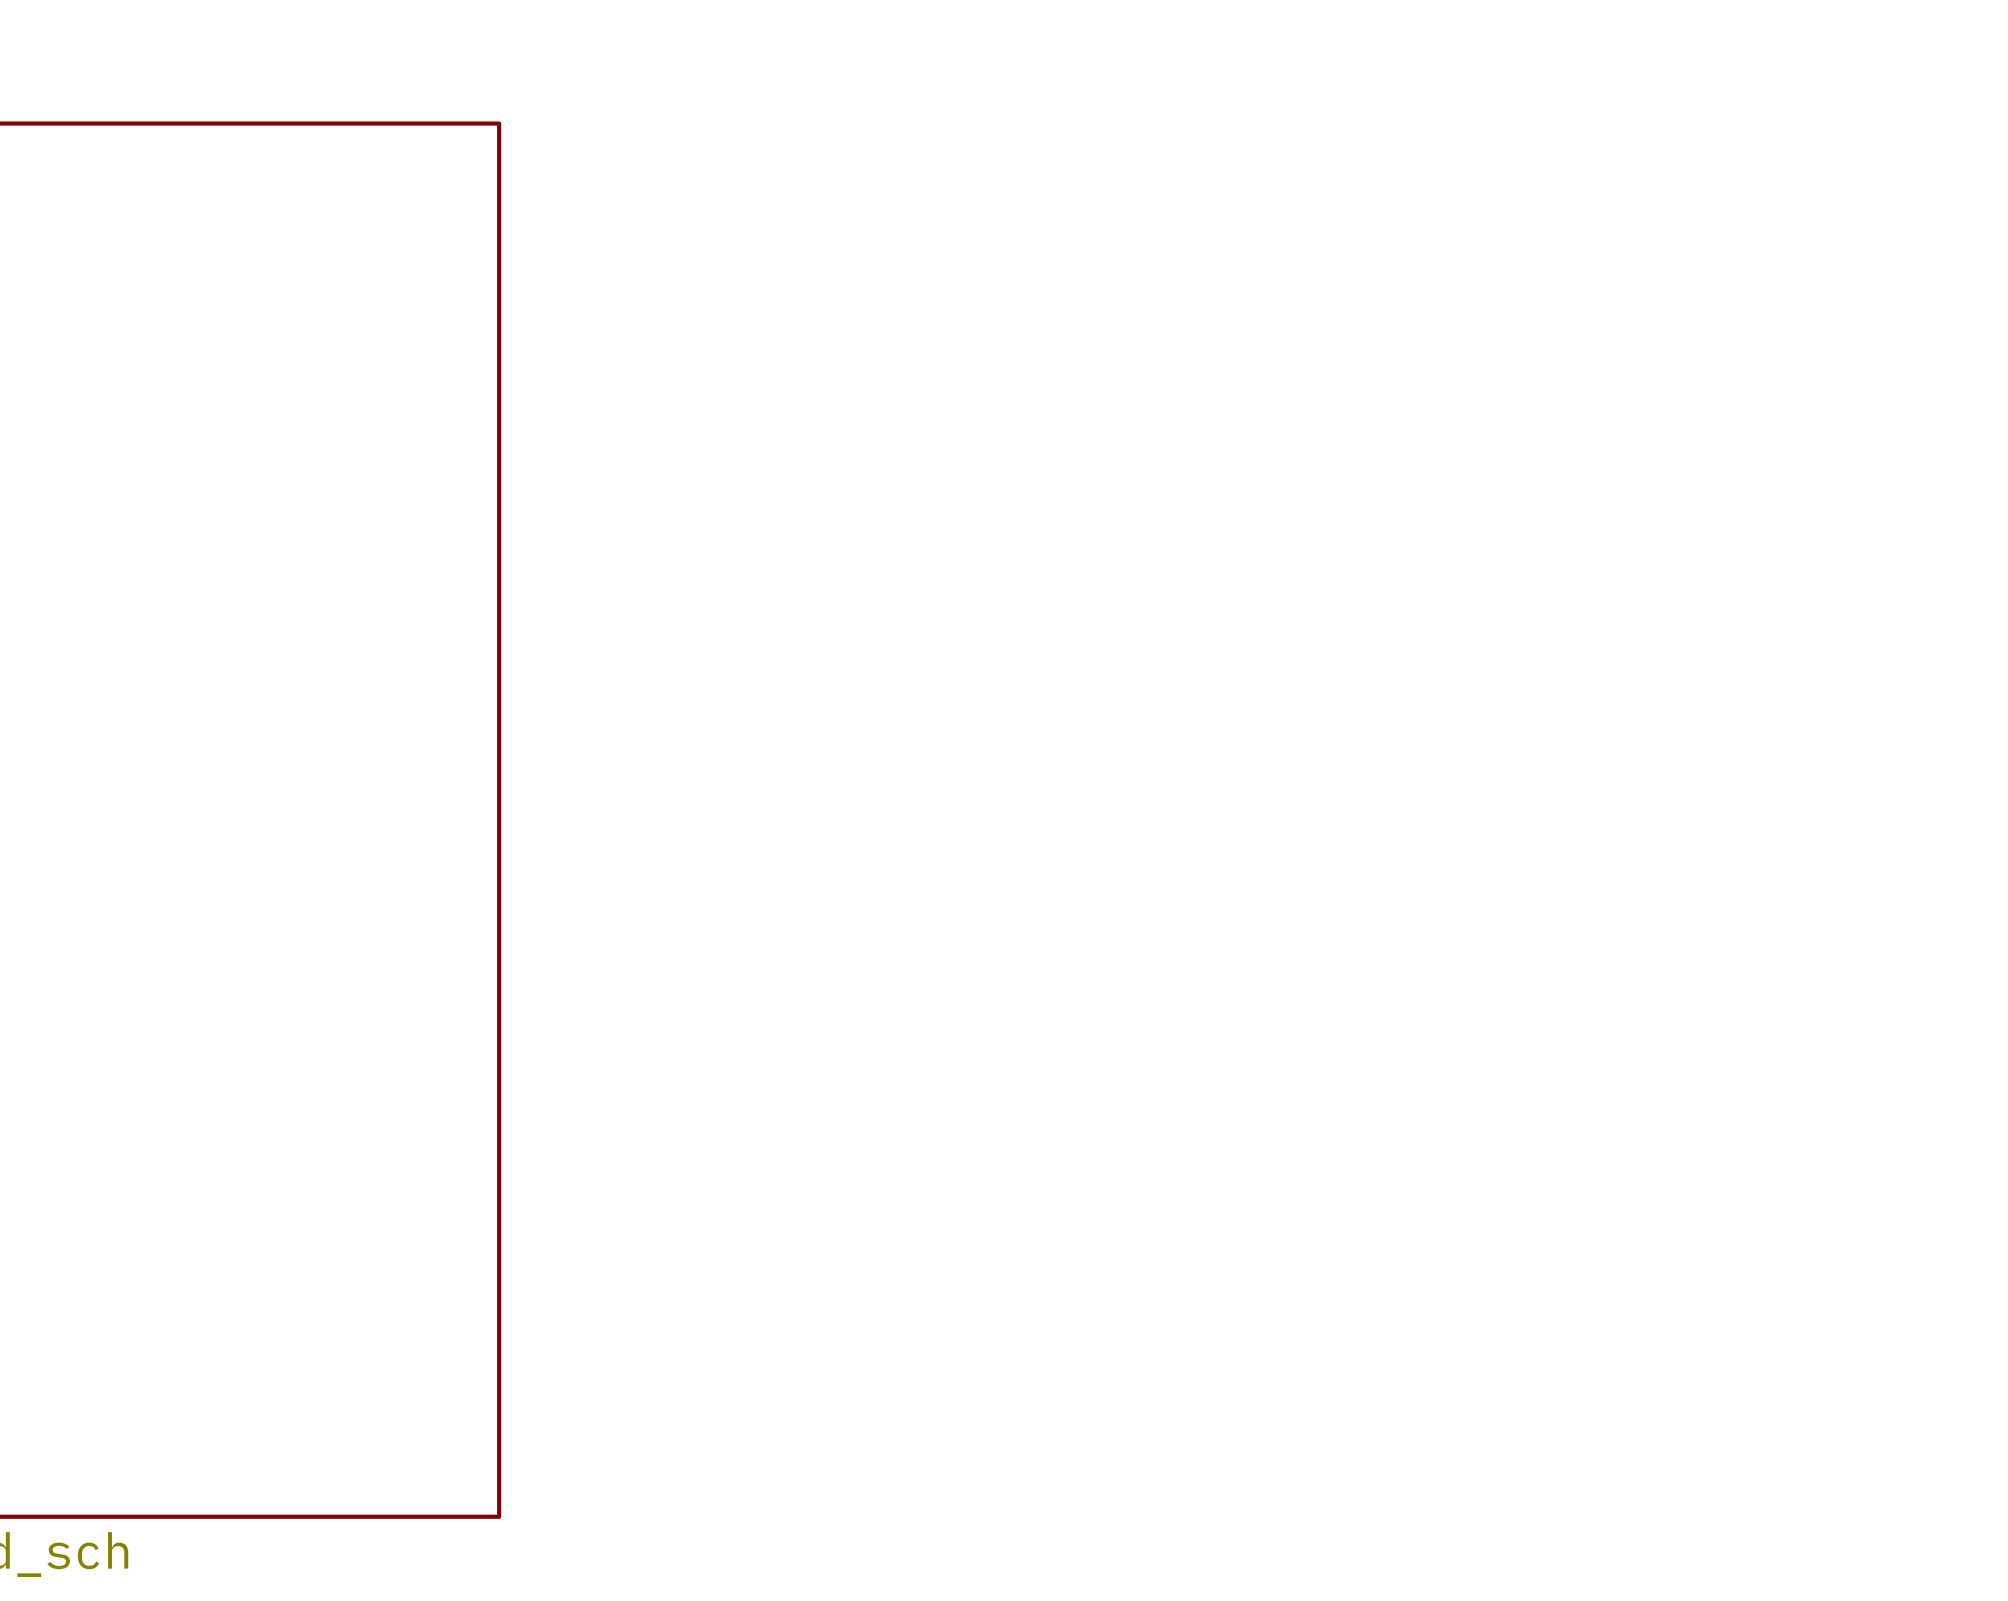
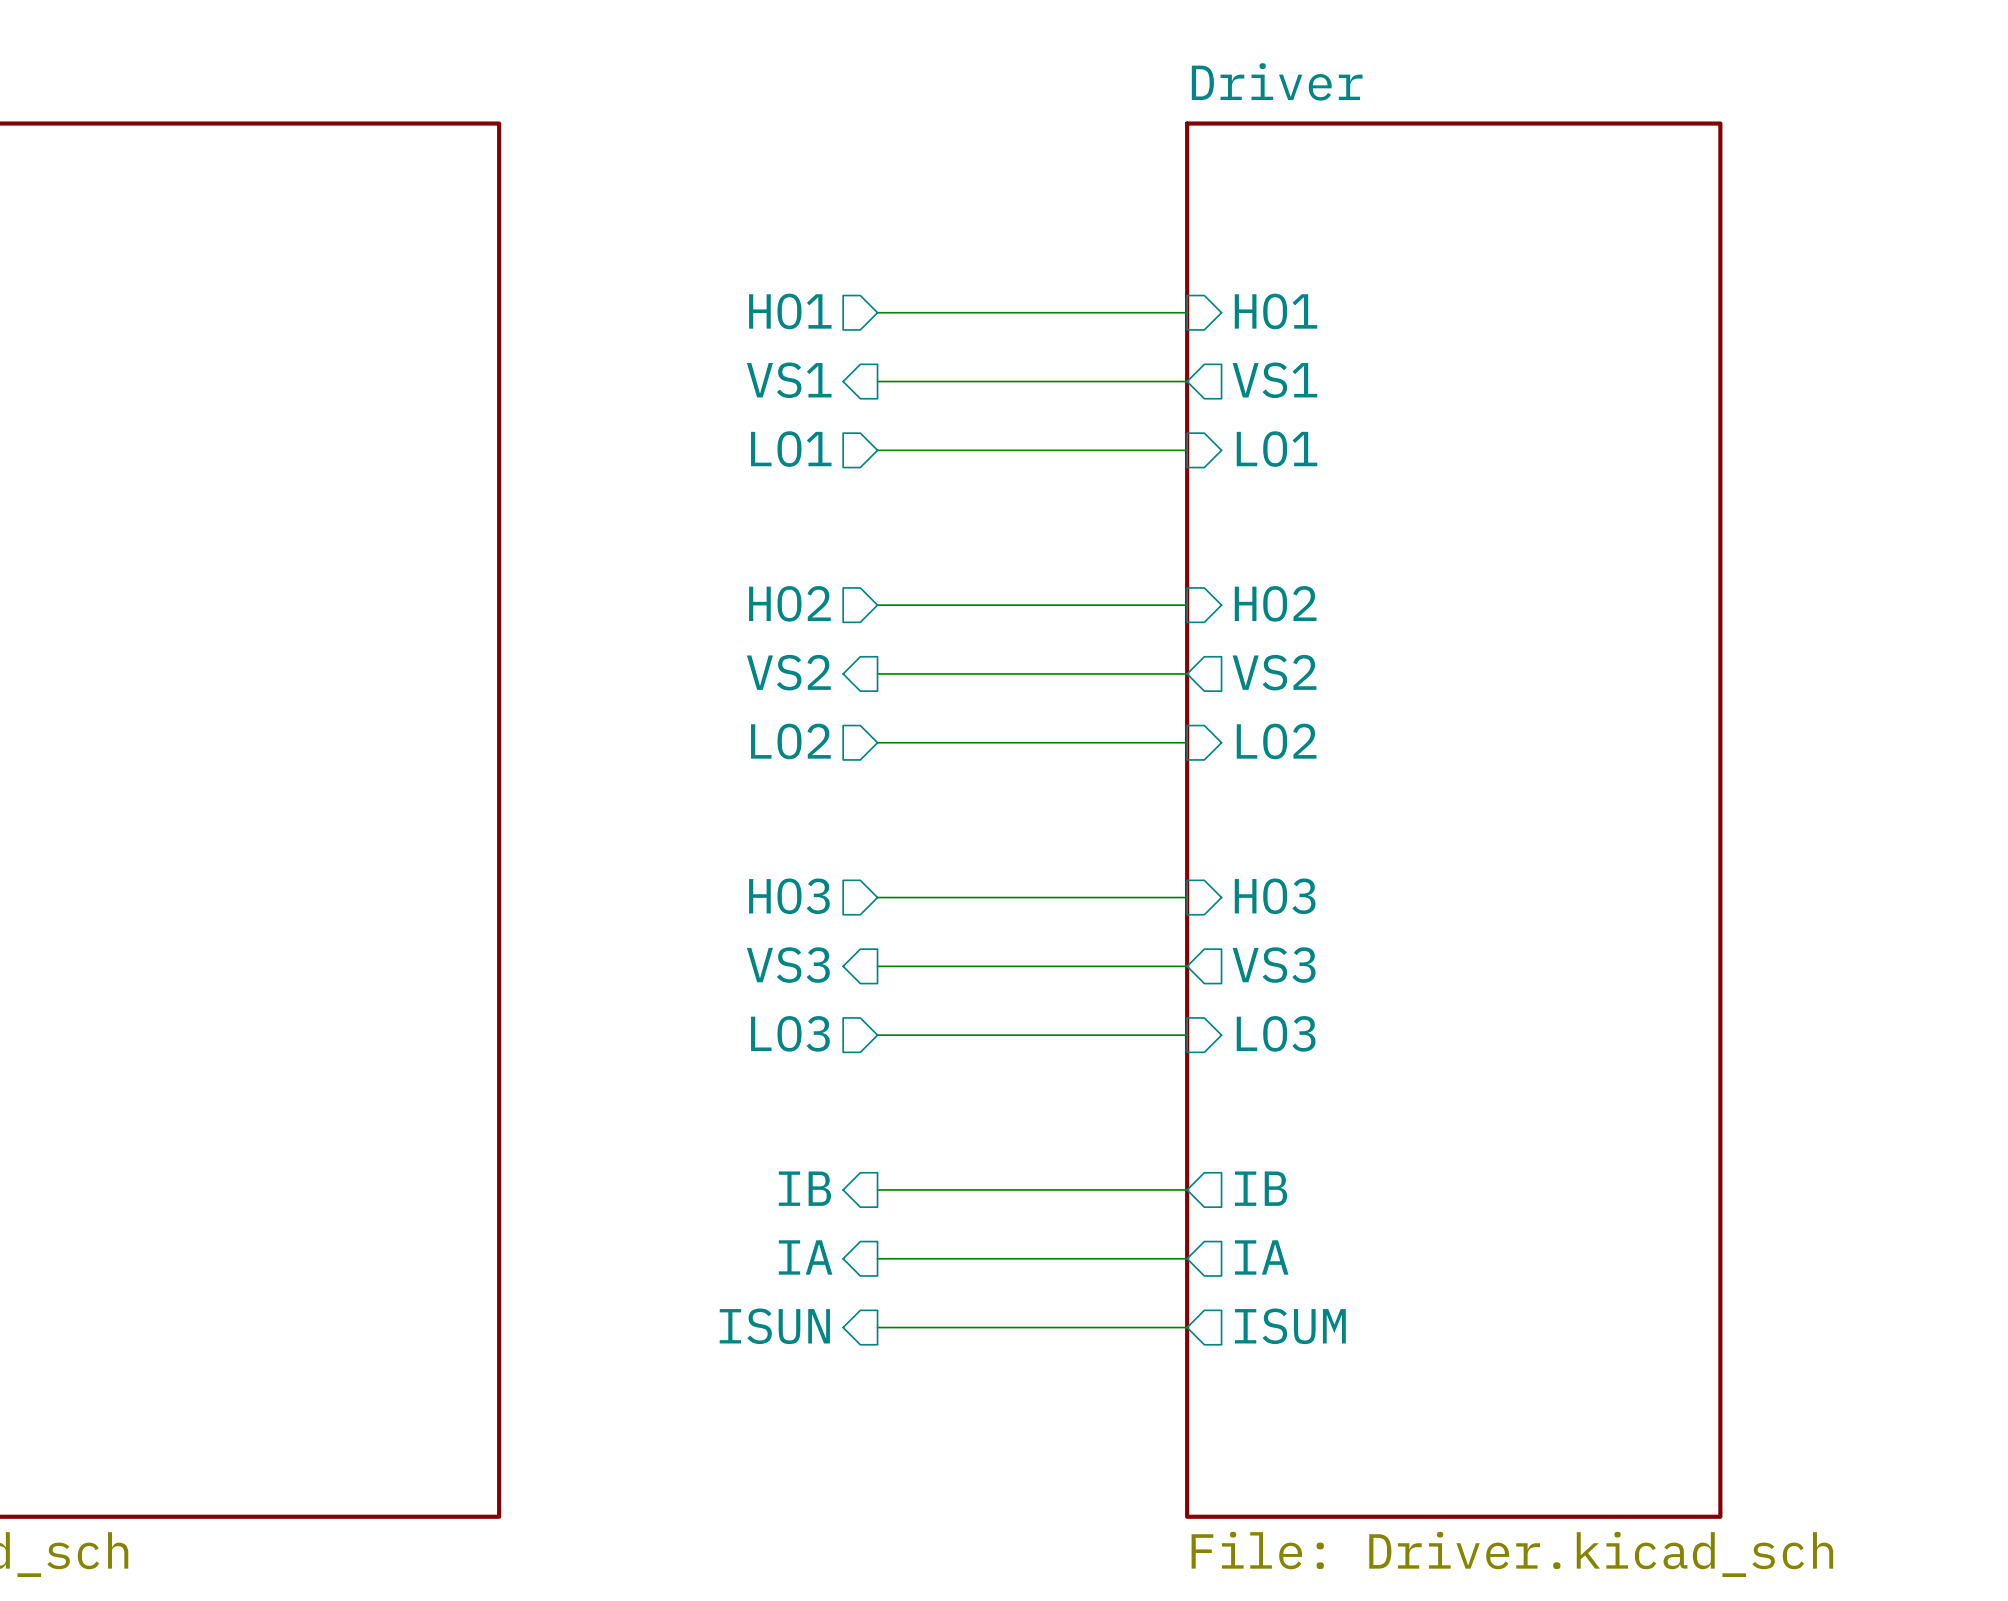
sheet pin: none -> HO1 (790, 311)
sheet pin: none -> HO1 (1276, 311)
wire: none -> (877, 312) (1187, 312)
sheet pin: none -> VS1 (789, 380)
sheet pin: none -> VS1 (1274, 380)
wire: none -> (877, 381) (1187, 381)
sheet pin: none -> LO1 (791, 449)
sheet pin: none -> LO1 (1276, 449)
wire: none -> (877, 450) (1187, 450)
sheet pin: none -> HO2 (789, 603)
sheet pin: none -> HO2 (1275, 603)
wire: none -> (877, 605) (1187, 605)
sheet pin: none -> VS2 (788, 672)
sheet pin: none -> VS2 (1274, 672)
wire: none -> (877, 673) (1187, 673)
sheet pin: none -> LO2 (790, 741)
sheet pin: none -> LO2 (1276, 741)
wire: none -> (877, 742) (1187, 742)
sheet Driver: none -> File: Driver.kicad_sch (1453, 820)
sheet pin: none -> HO3 (789, 896)
sheet pin: none -> HO3 (1275, 896)
wire: none -> (877, 897) (1187, 897)
sheet pin: none -> VS3 (788, 965)
sheet pin: none -> VS3 (1274, 965)
wire: none -> (877, 966) (1187, 966)
sheet pin: none -> LO3 (790, 1033)
sheet pin: none -> LO3 (1276, 1033)
wire: none -> (877, 1035) (1187, 1035)
sheet pin: none -> IB (804, 1188)
sheet pin: none -> IB (1261, 1188)
wire: none -> (877, 1189) (1187, 1189)
sheet pin: none -> IA (805, 1257)
sheet pin: none -> IA (1261, 1257)
wire: none -> (877, 1258) (1187, 1258)
sheet pin: none -> ISUN (774, 1326)
sheet pin: none -> ISUM (1290, 1326)
wire: none -> (877, 1327) (1187, 1327)

